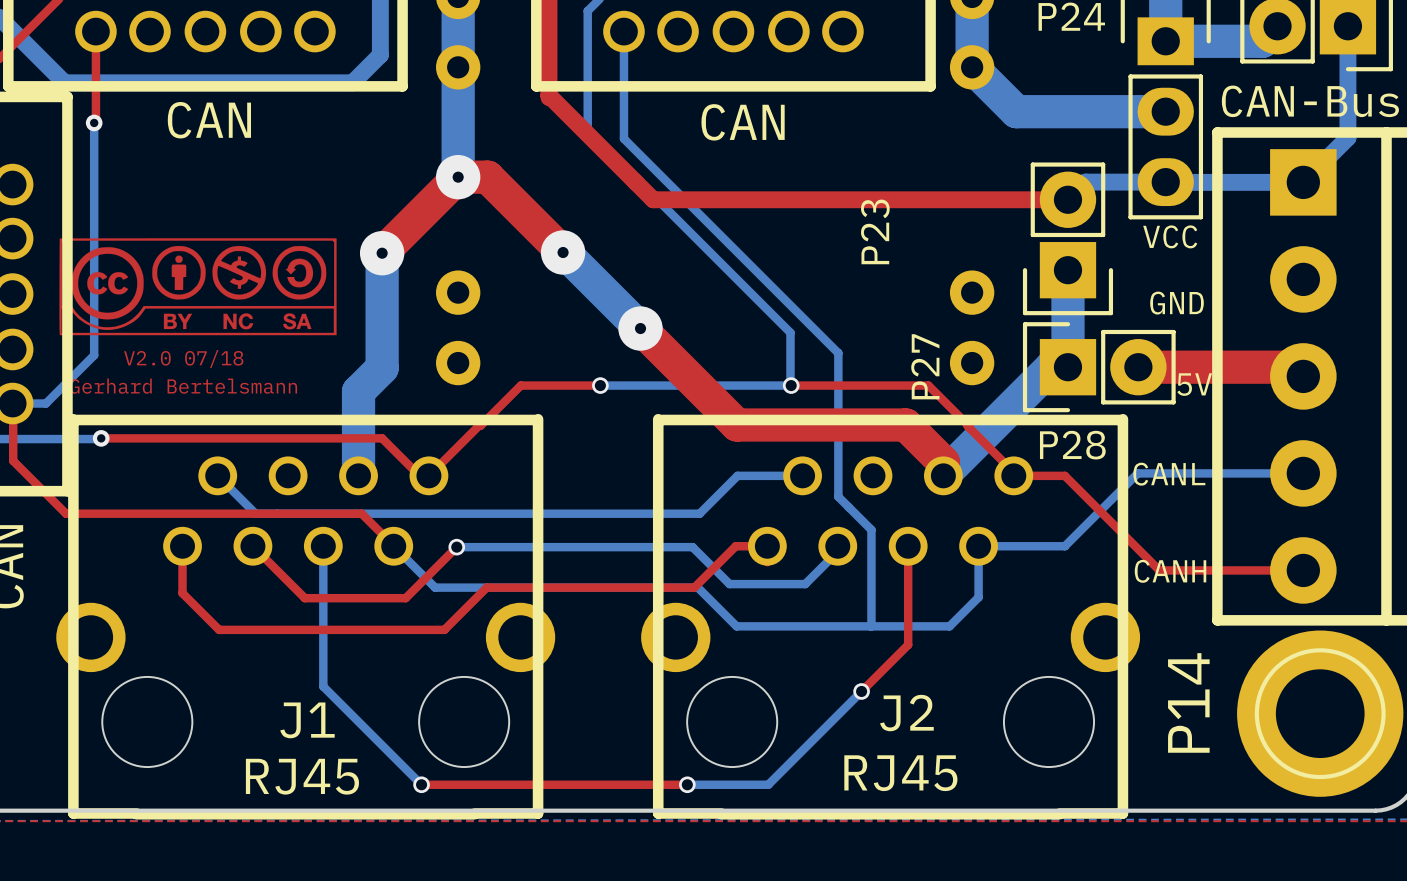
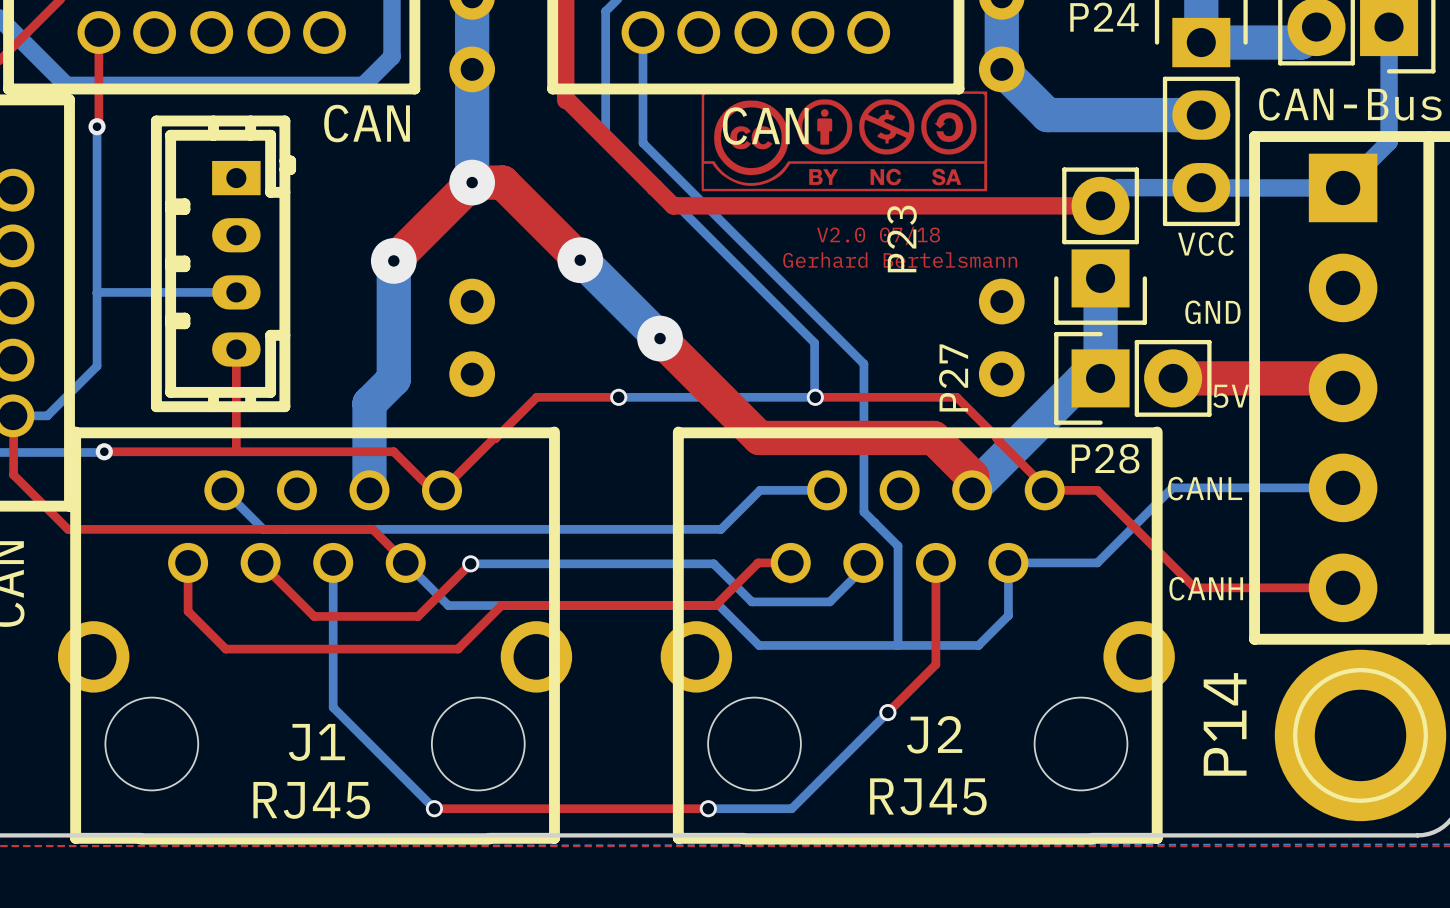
part value position: CAN (209, 120) -> CAN (367, 123)
text: none -> Gerhard Bertelsmann (900, 260)
part: none -> (223, 263)
bottom track: none -> (97, 292) (236, 292)
drawing position: (198, 286) -> (844, 141)
top track: none -> (236, 349) (236, 451)
text position: V2.0 07/18 (183, 359) -> V2.0 07/18 (878, 235)
text: Gerhard Bertelsmann (183, 386) -> none

